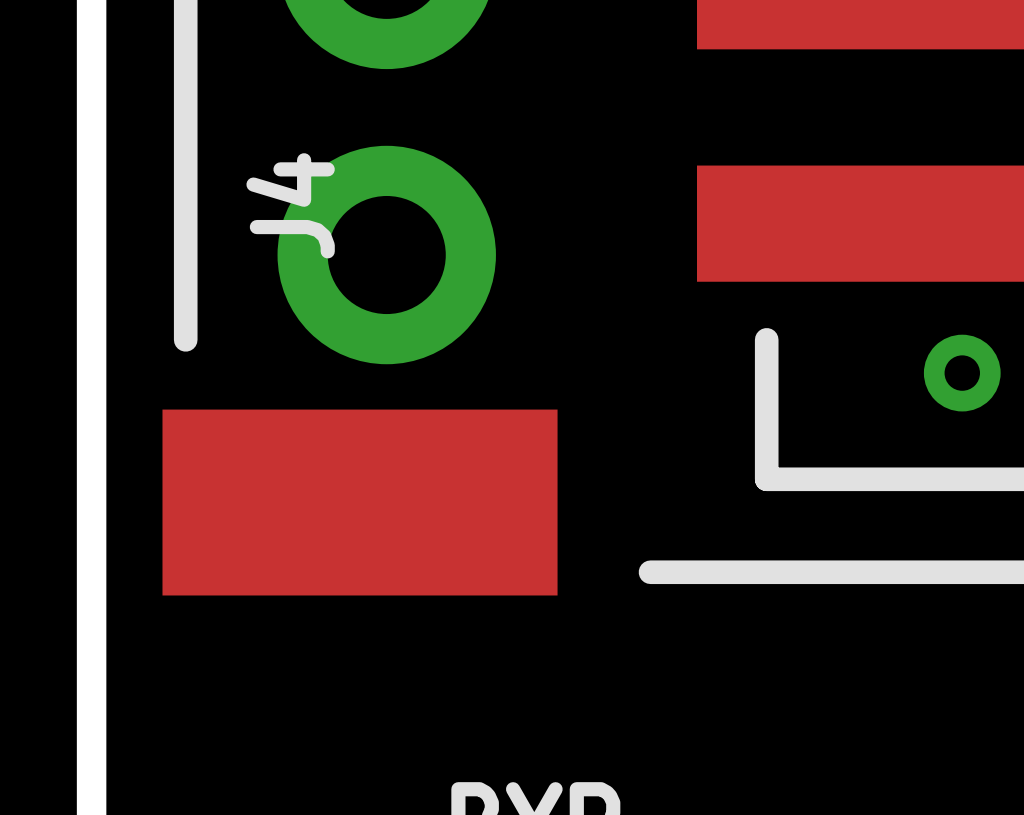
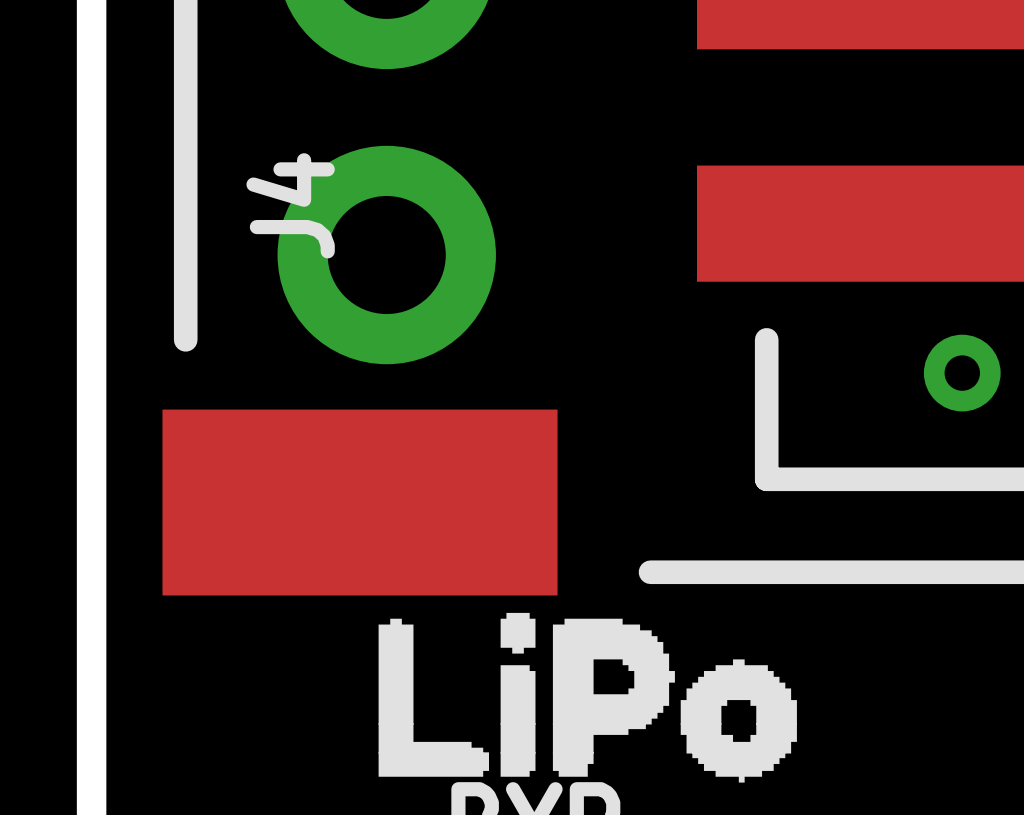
drawing: none -> [378, 612, 797, 783]

